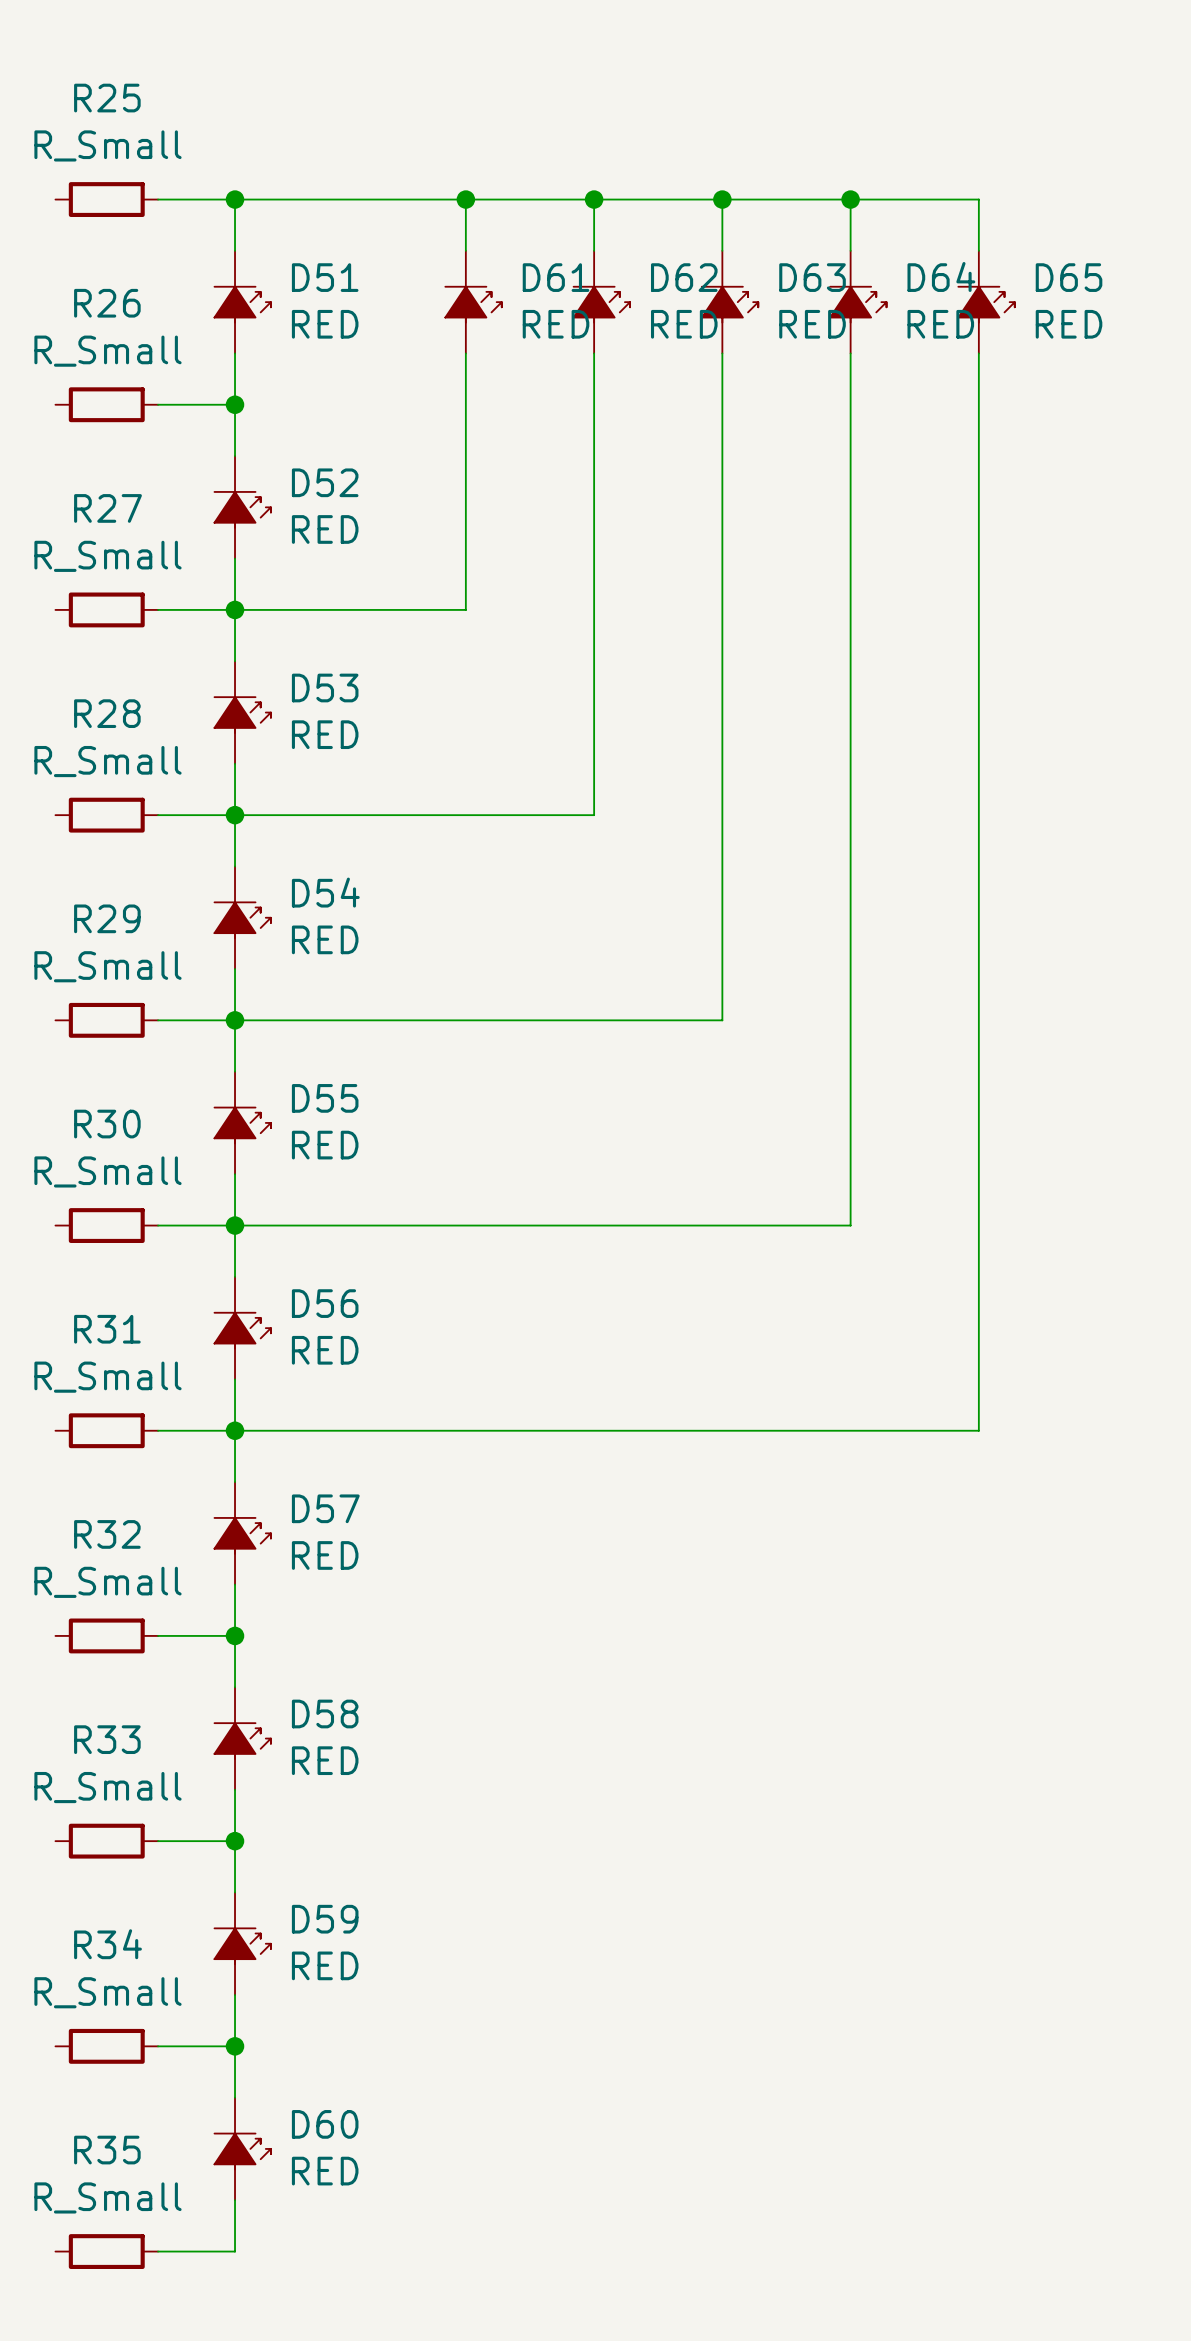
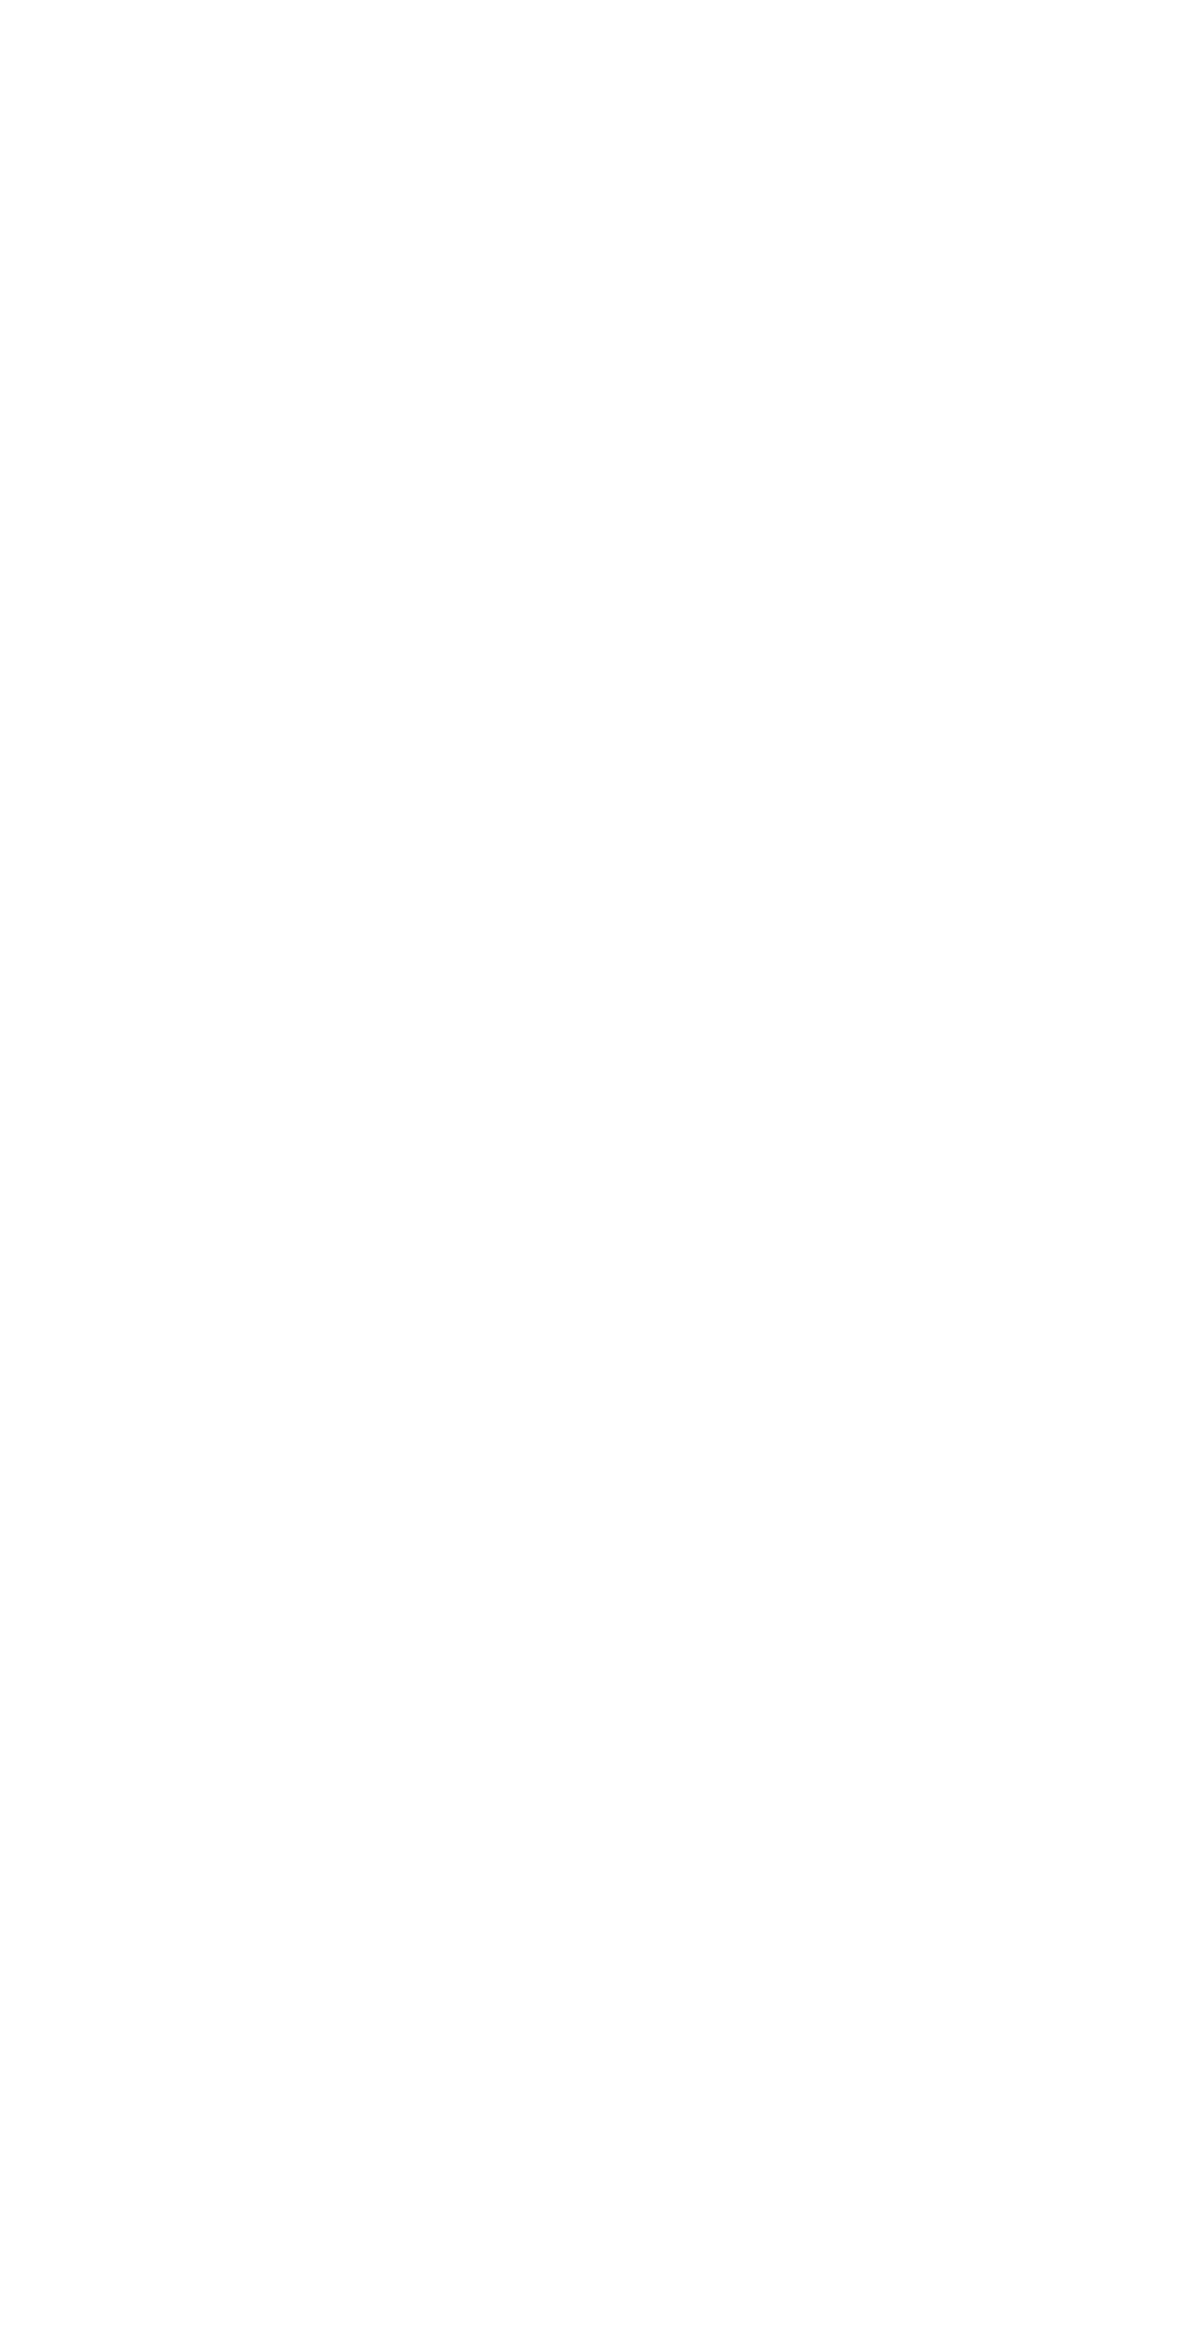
R25: R_Small (106, 199) -> none
wire: (158, 199) (978, 199) (978, 250) -> none
wire: (235, 199) (235, 250) -> none
junction: (235, 199) -> none
wire: (465, 199) (465, 250) -> none
junction: (465, 199) -> none
wire: (594, 199) (594, 250) -> none
junction: (594, 199) -> none
wire: (722, 199) (722, 250) -> none
junction: (722, 199) -> none
wire: (850, 199) (850, 250) -> none
junction: (850, 199) -> none
D51: RED (242, 302) -> none
D61: RED (473, 302) -> none
D62: RED (601, 302) -> none
D63: RED (730, 302) -> none
D64: RED (858, 302) -> none
D65: RED (986, 302) -> none
wire: (235, 353) (235, 456) -> none
wire: (465, 353) (465, 609) (158, 609) -> none
wire: (594, 353) (594, 815) (158, 815) -> none
wire: (722, 353) (722, 1020) (158, 1020) -> none
wire: (850, 353) (850, 1225) (158, 1225) -> none
wire: (978, 353) (978, 1430) (158, 1430) -> none
R26: R_Small (106, 404) -> none
wire: (158, 404) (235, 404) -> none
junction: (235, 404) -> none
D52: RED (242, 507) -> none
wire: (235, 558) (235, 661) -> none
R27: R_Small (106, 609) -> none
junction: (235, 609) -> none
D53: RED (242, 712) -> none
wire: (235, 763) (235, 866) -> none
R28: R_Small (106, 815) -> none
junction: (235, 815) -> none
D54: RED (242, 917) -> none
wire: (235, 969) (235, 1071) -> none
R29: R_Small (106, 1020) -> none
junction: (235, 1020) -> none
D55: RED (242, 1122) -> none
wire: (235, 1174) (235, 1276) -> none
R30: R_Small (106, 1225) -> none
junction: (235, 1225) -> none
D56: RED (242, 1328) -> none
wire: (235, 1379) (235, 1482) -> none
R31: R_Small (106, 1430) -> none
junction: (235, 1430) -> none
D57: RED (242, 1533) -> none
wire: (235, 1584) (235, 1687) -> none
R32: R_Small (106, 1635) -> none
wire: (158, 1635) (235, 1635) -> none
junction: (235, 1635) -> none
D58: RED (242, 1738) -> none
wire: (235, 1789) (235, 1892) -> none
R33: R_Small (106, 1841) -> none
wire: (158, 1841) (235, 1841) -> none
junction: (235, 1841) -> none
D59: RED (242, 1943) -> none
wire: (235, 1995) (235, 2097) -> none
R34: R_Small (106, 2046) -> none
wire: (158, 2046) (235, 2046) -> none
junction: (235, 2046) -> none
D60: RED (242, 2148) -> none
wire: (235, 2200) (235, 2251) (158, 2251) -> none
R35: R_Small (106, 2251) -> none

